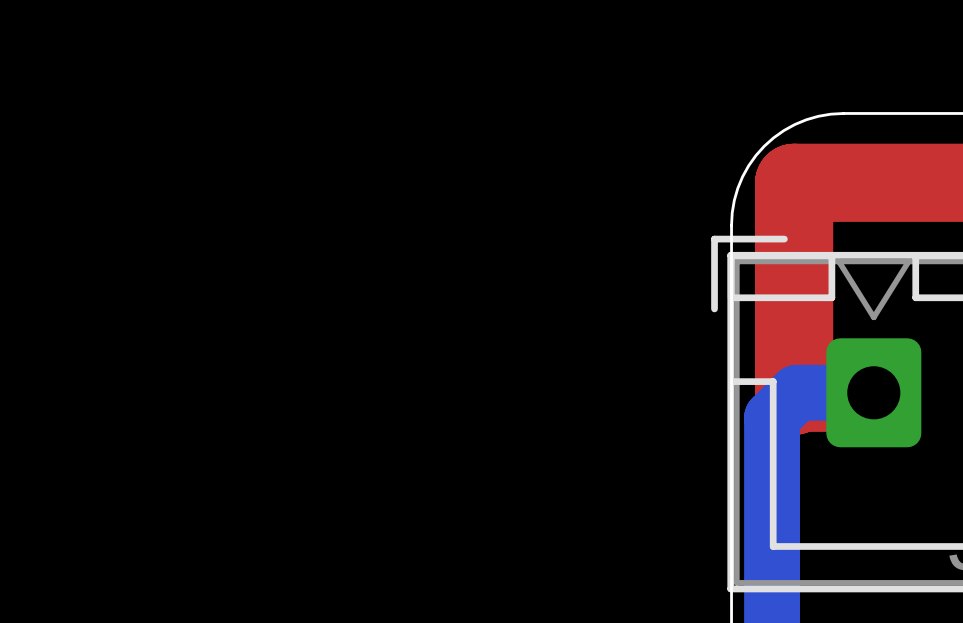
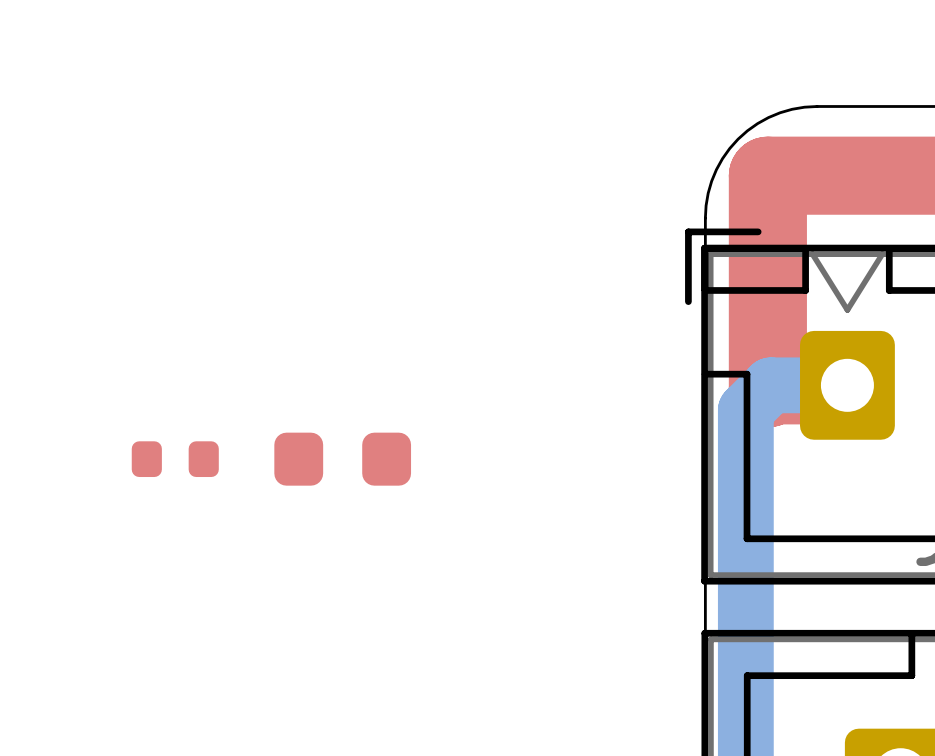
part: none -> (175, 459)
part: none -> (342, 459)

